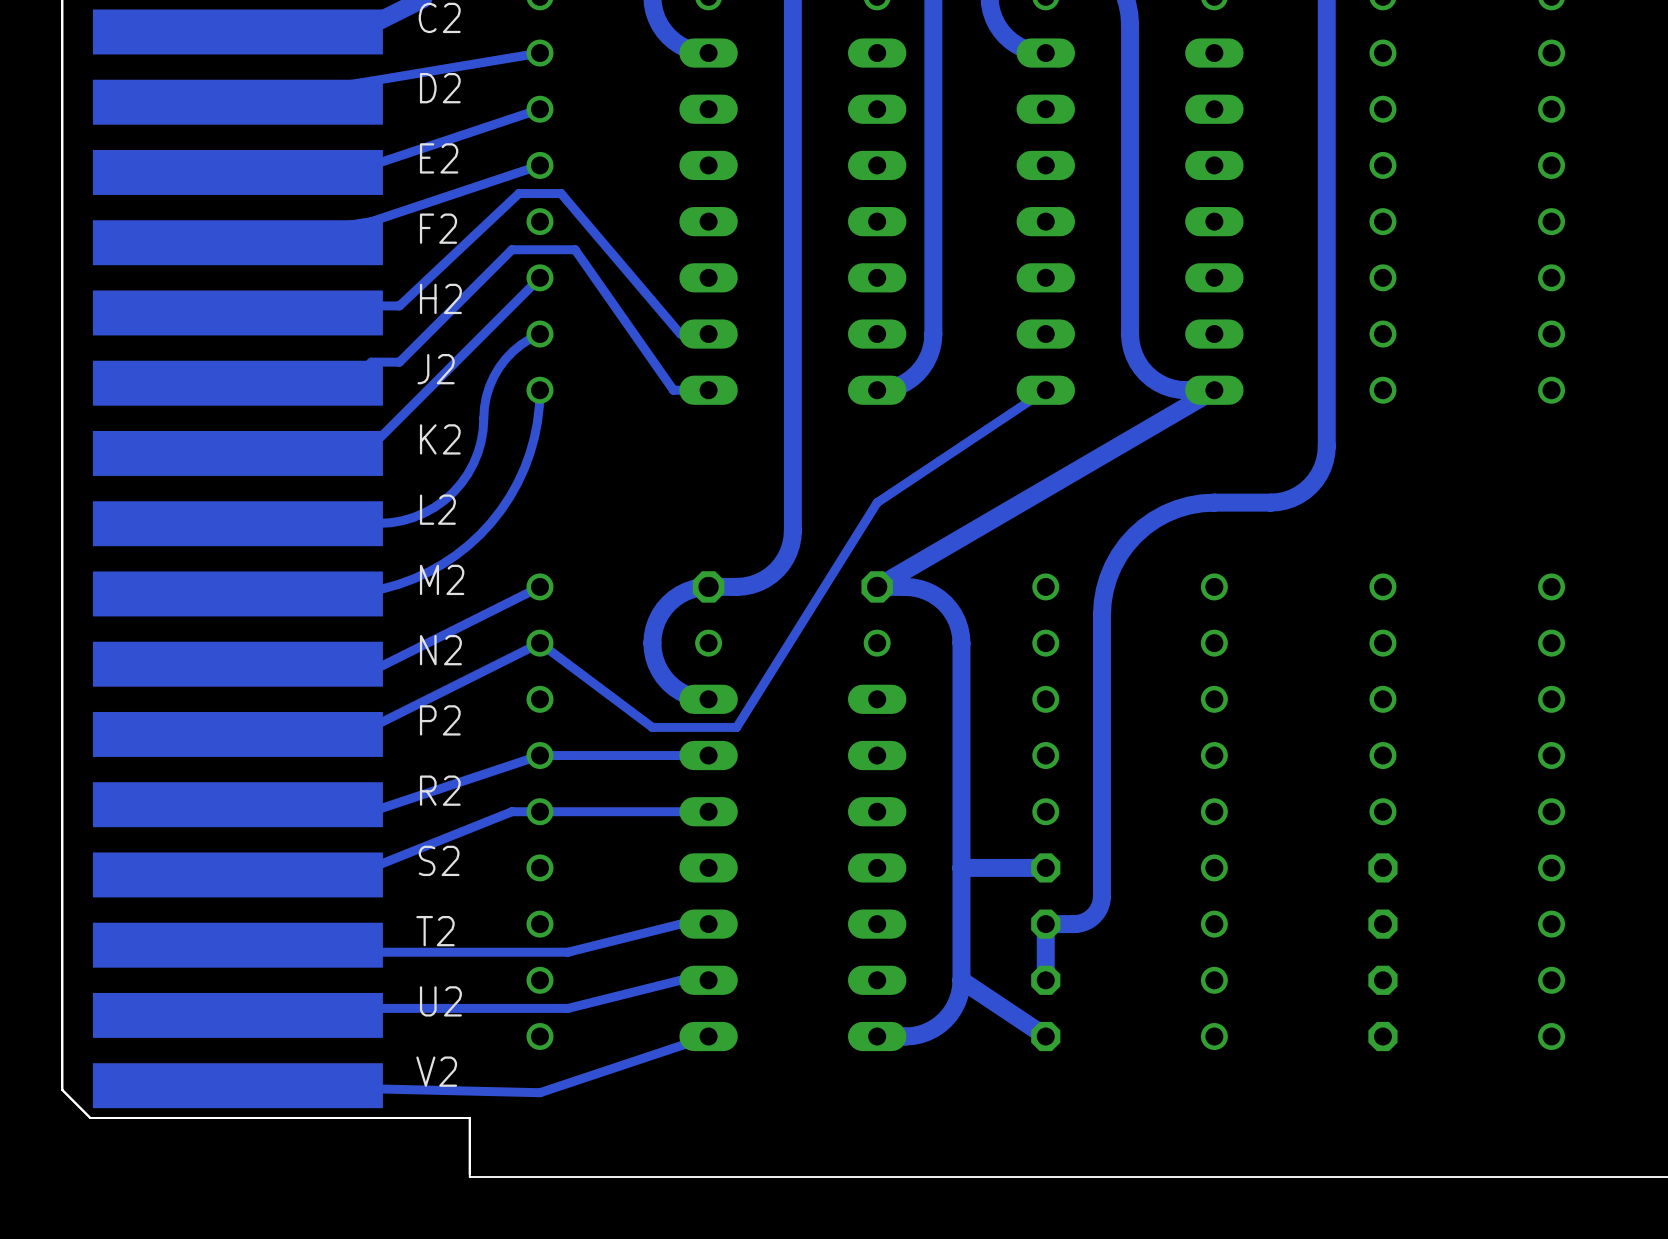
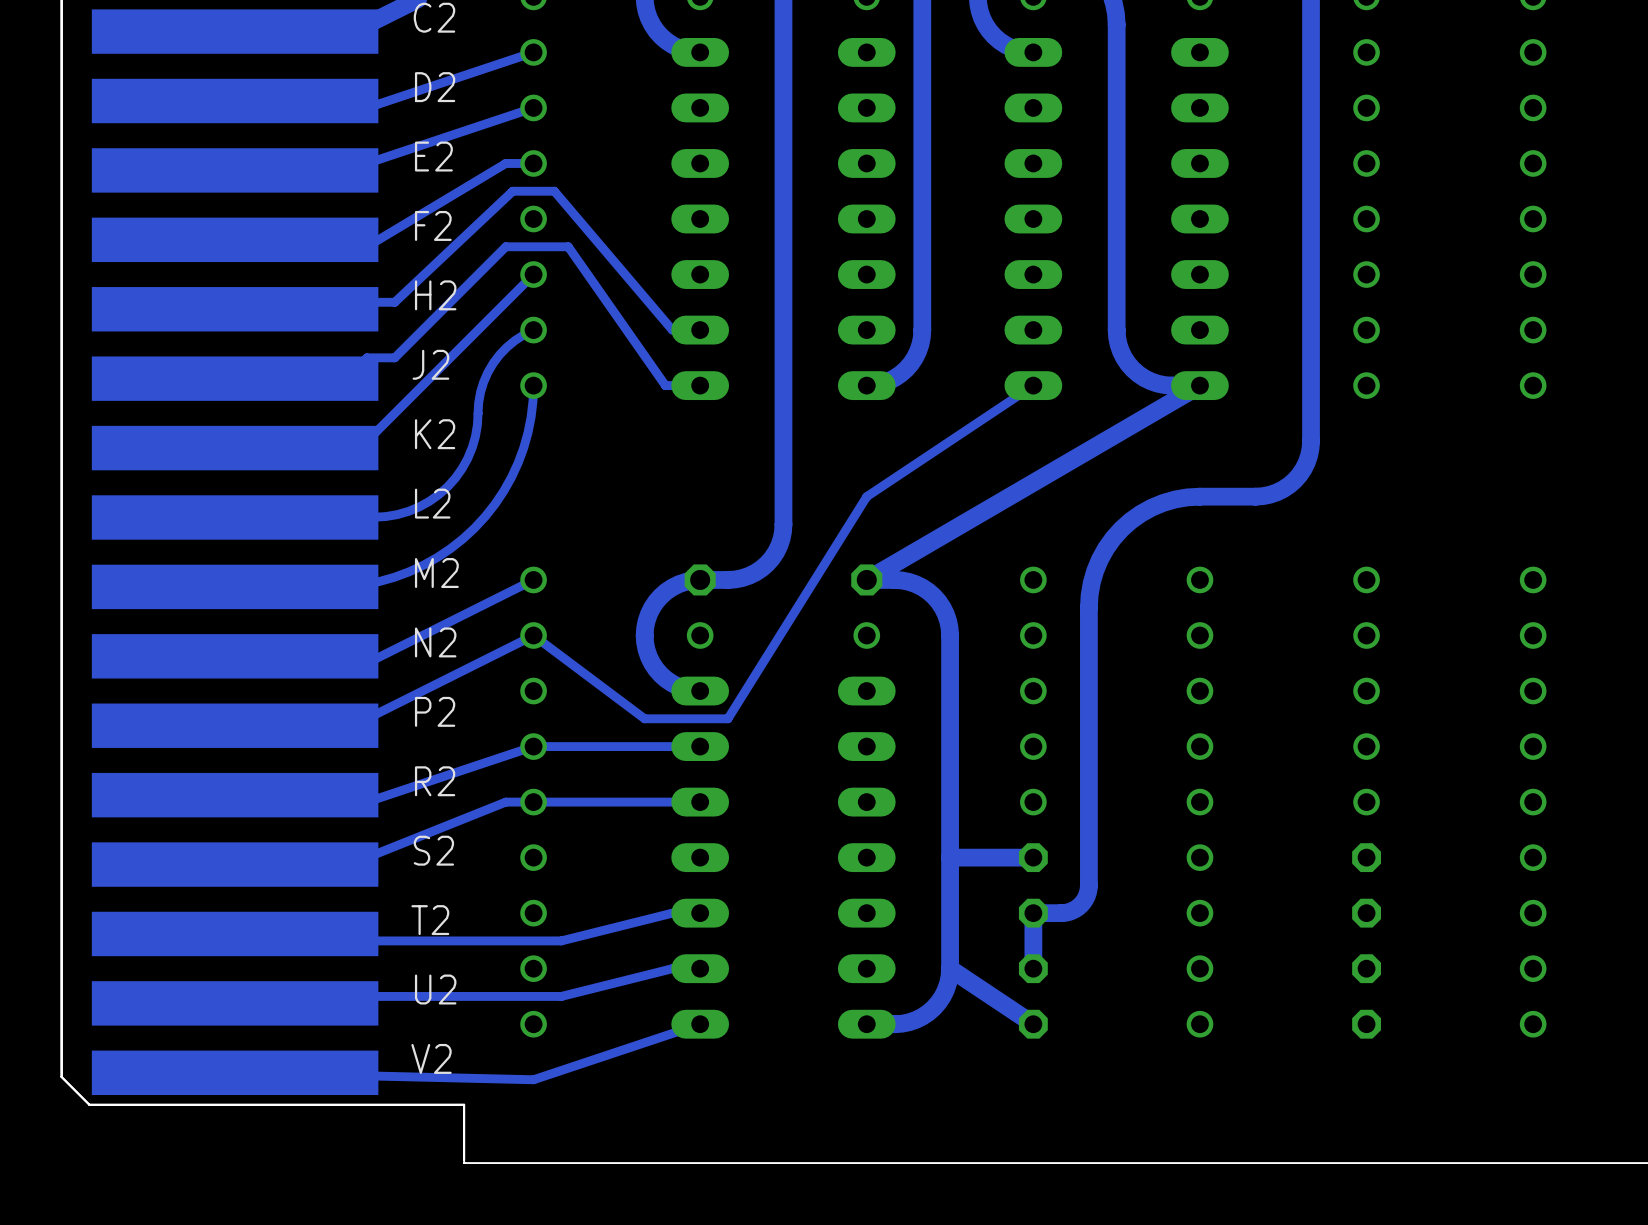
track: (539, 53) (237, 102) -> (533, 52) (366, 107) (235, 101)
track: (539, 165) (371, 221) (237, 242) -> (533, 163) (505, 163) (366, 246) (235, 239)

